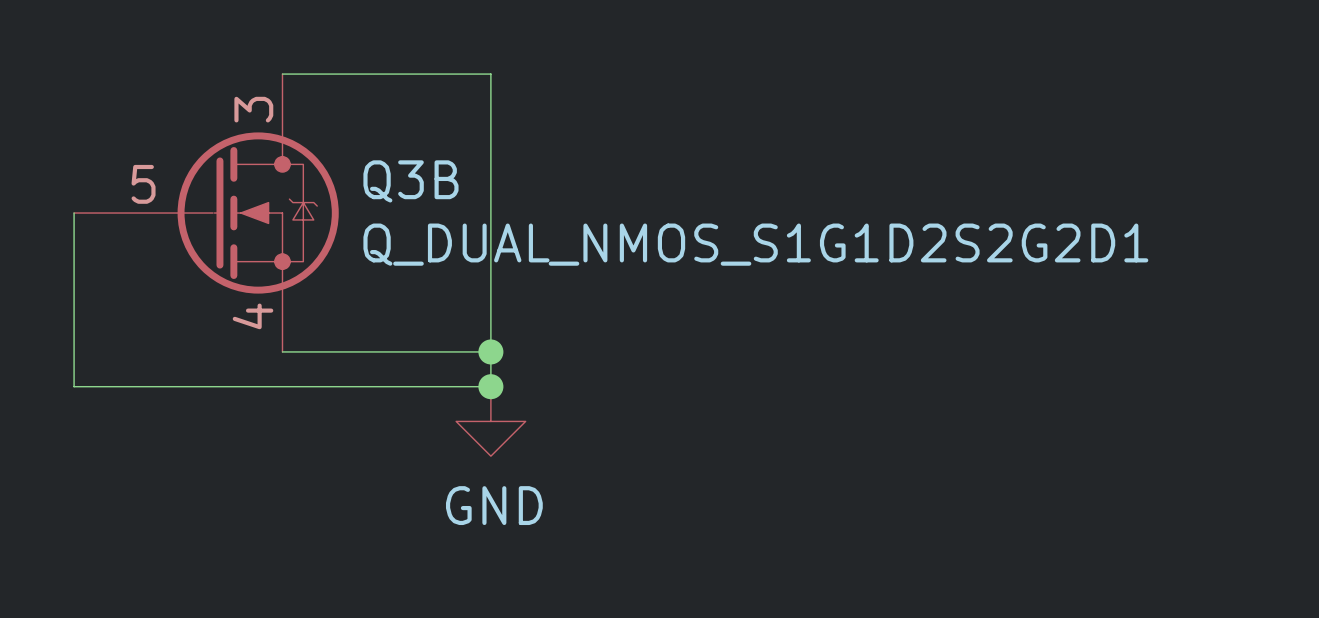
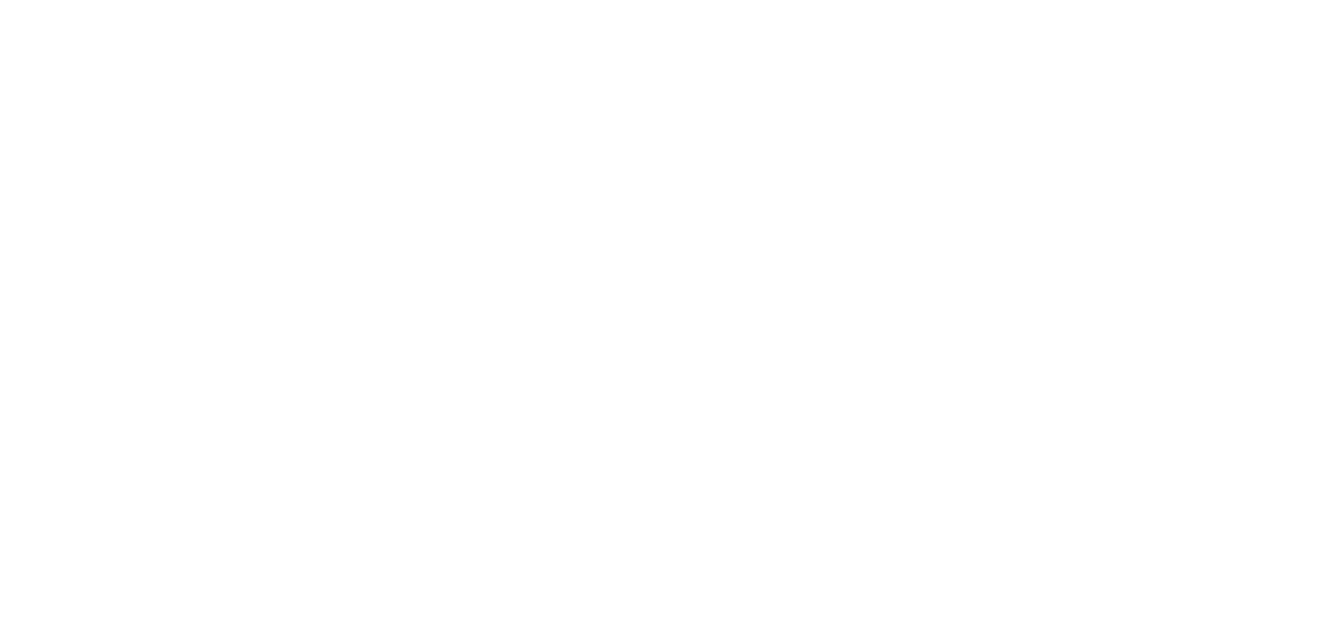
wire: (282, 74) (490, 74) (490, 386) (74, 386) (74, 213) -> none
Q3B: Q_DUAL_NMOS_S1G1D2S2G2D1 (206, 213) -> none
wire: (282, 351) (490, 351) -> none
junction: (490, 351) -> none
junction: (490, 386) -> none
power symbol: GND (490, 421) -> none

